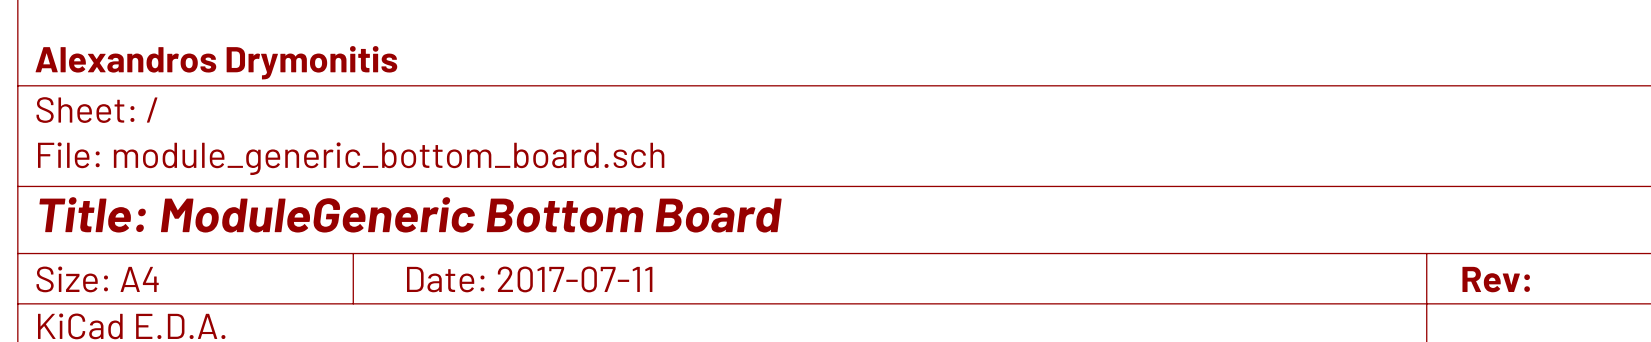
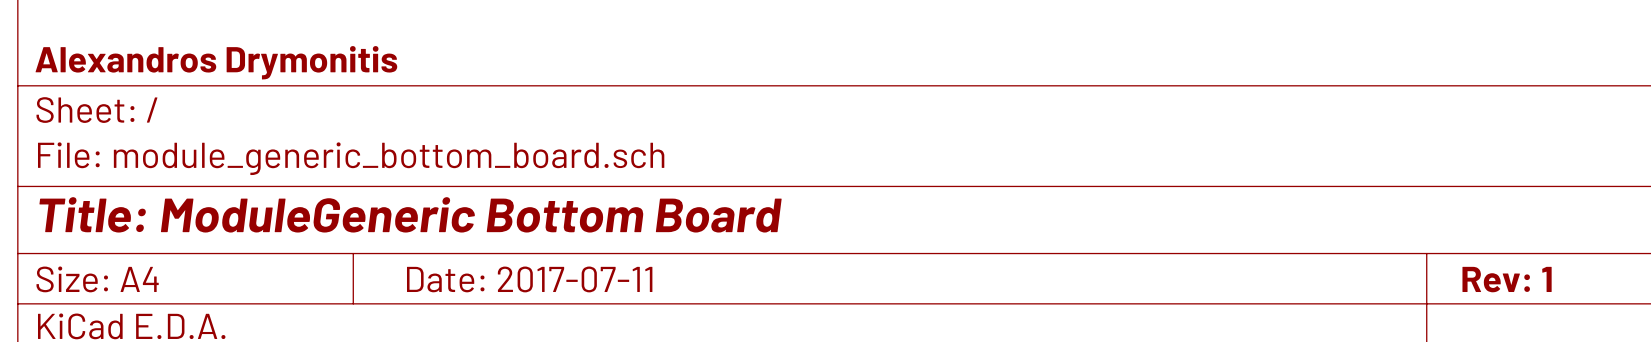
title block: Rev: (1496, 279) -> Rev: 1 (1507, 279)

